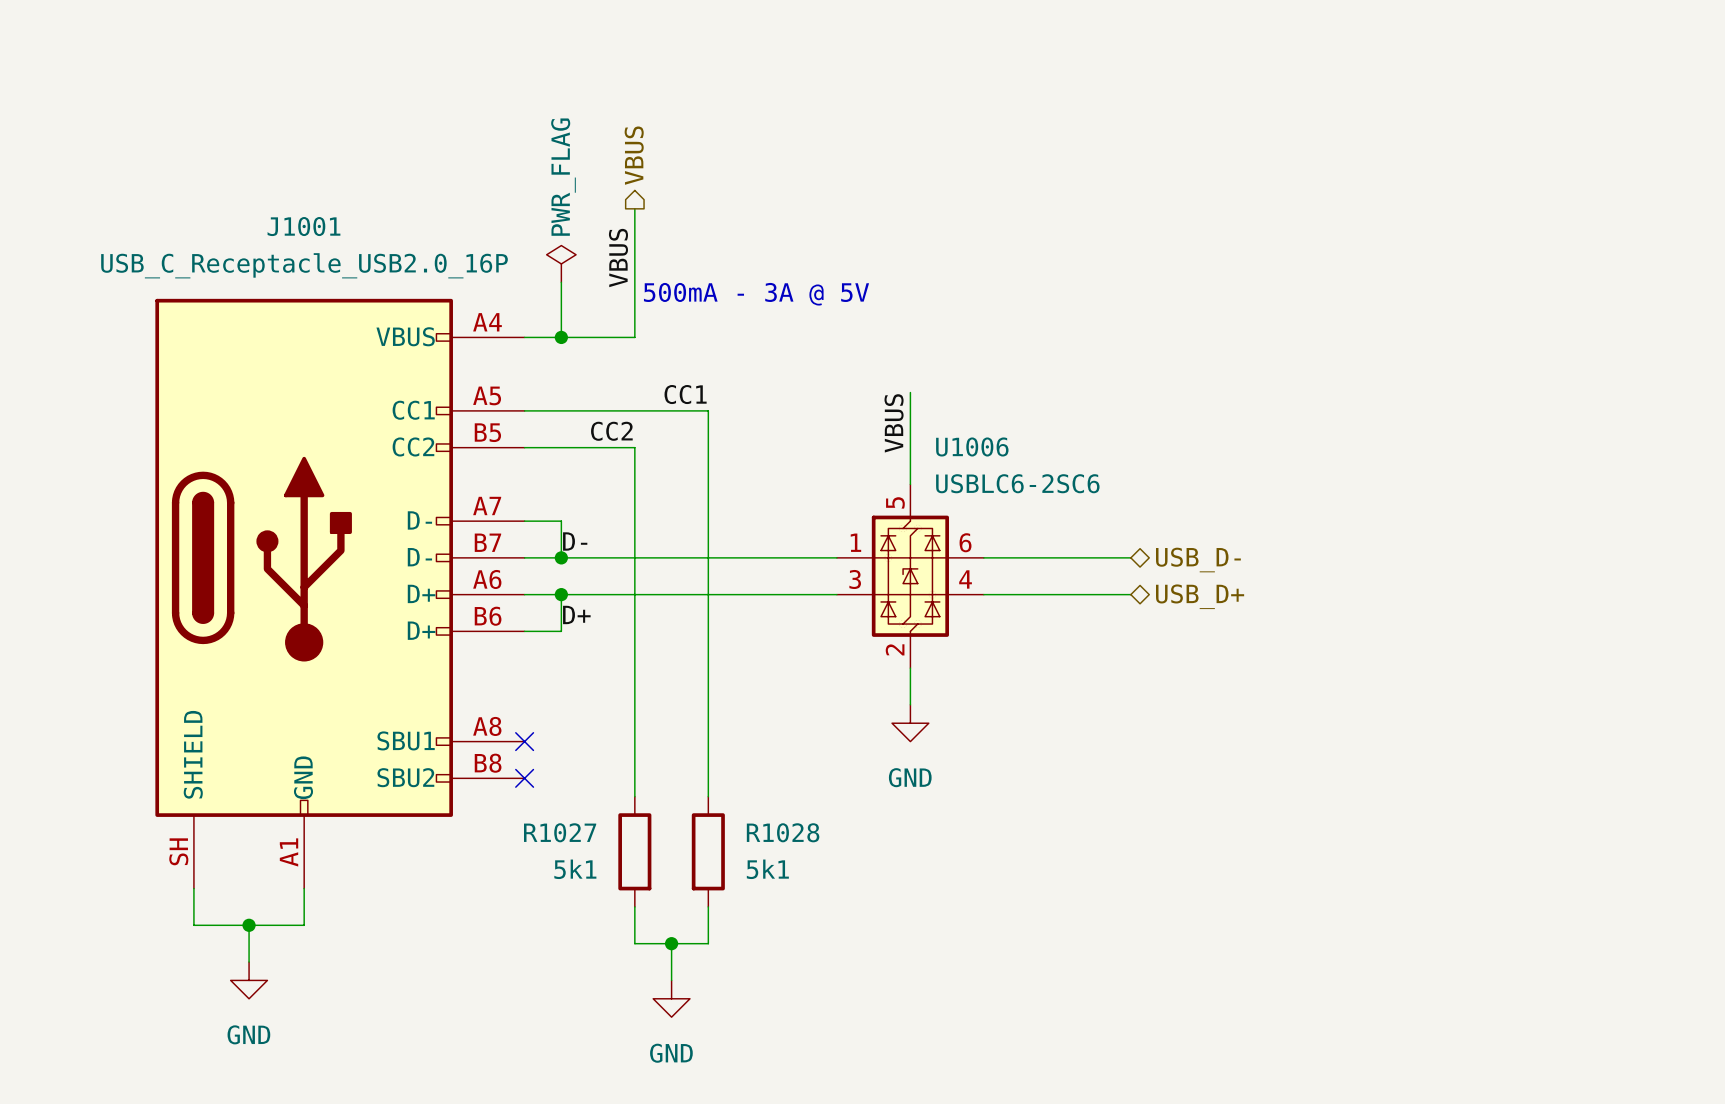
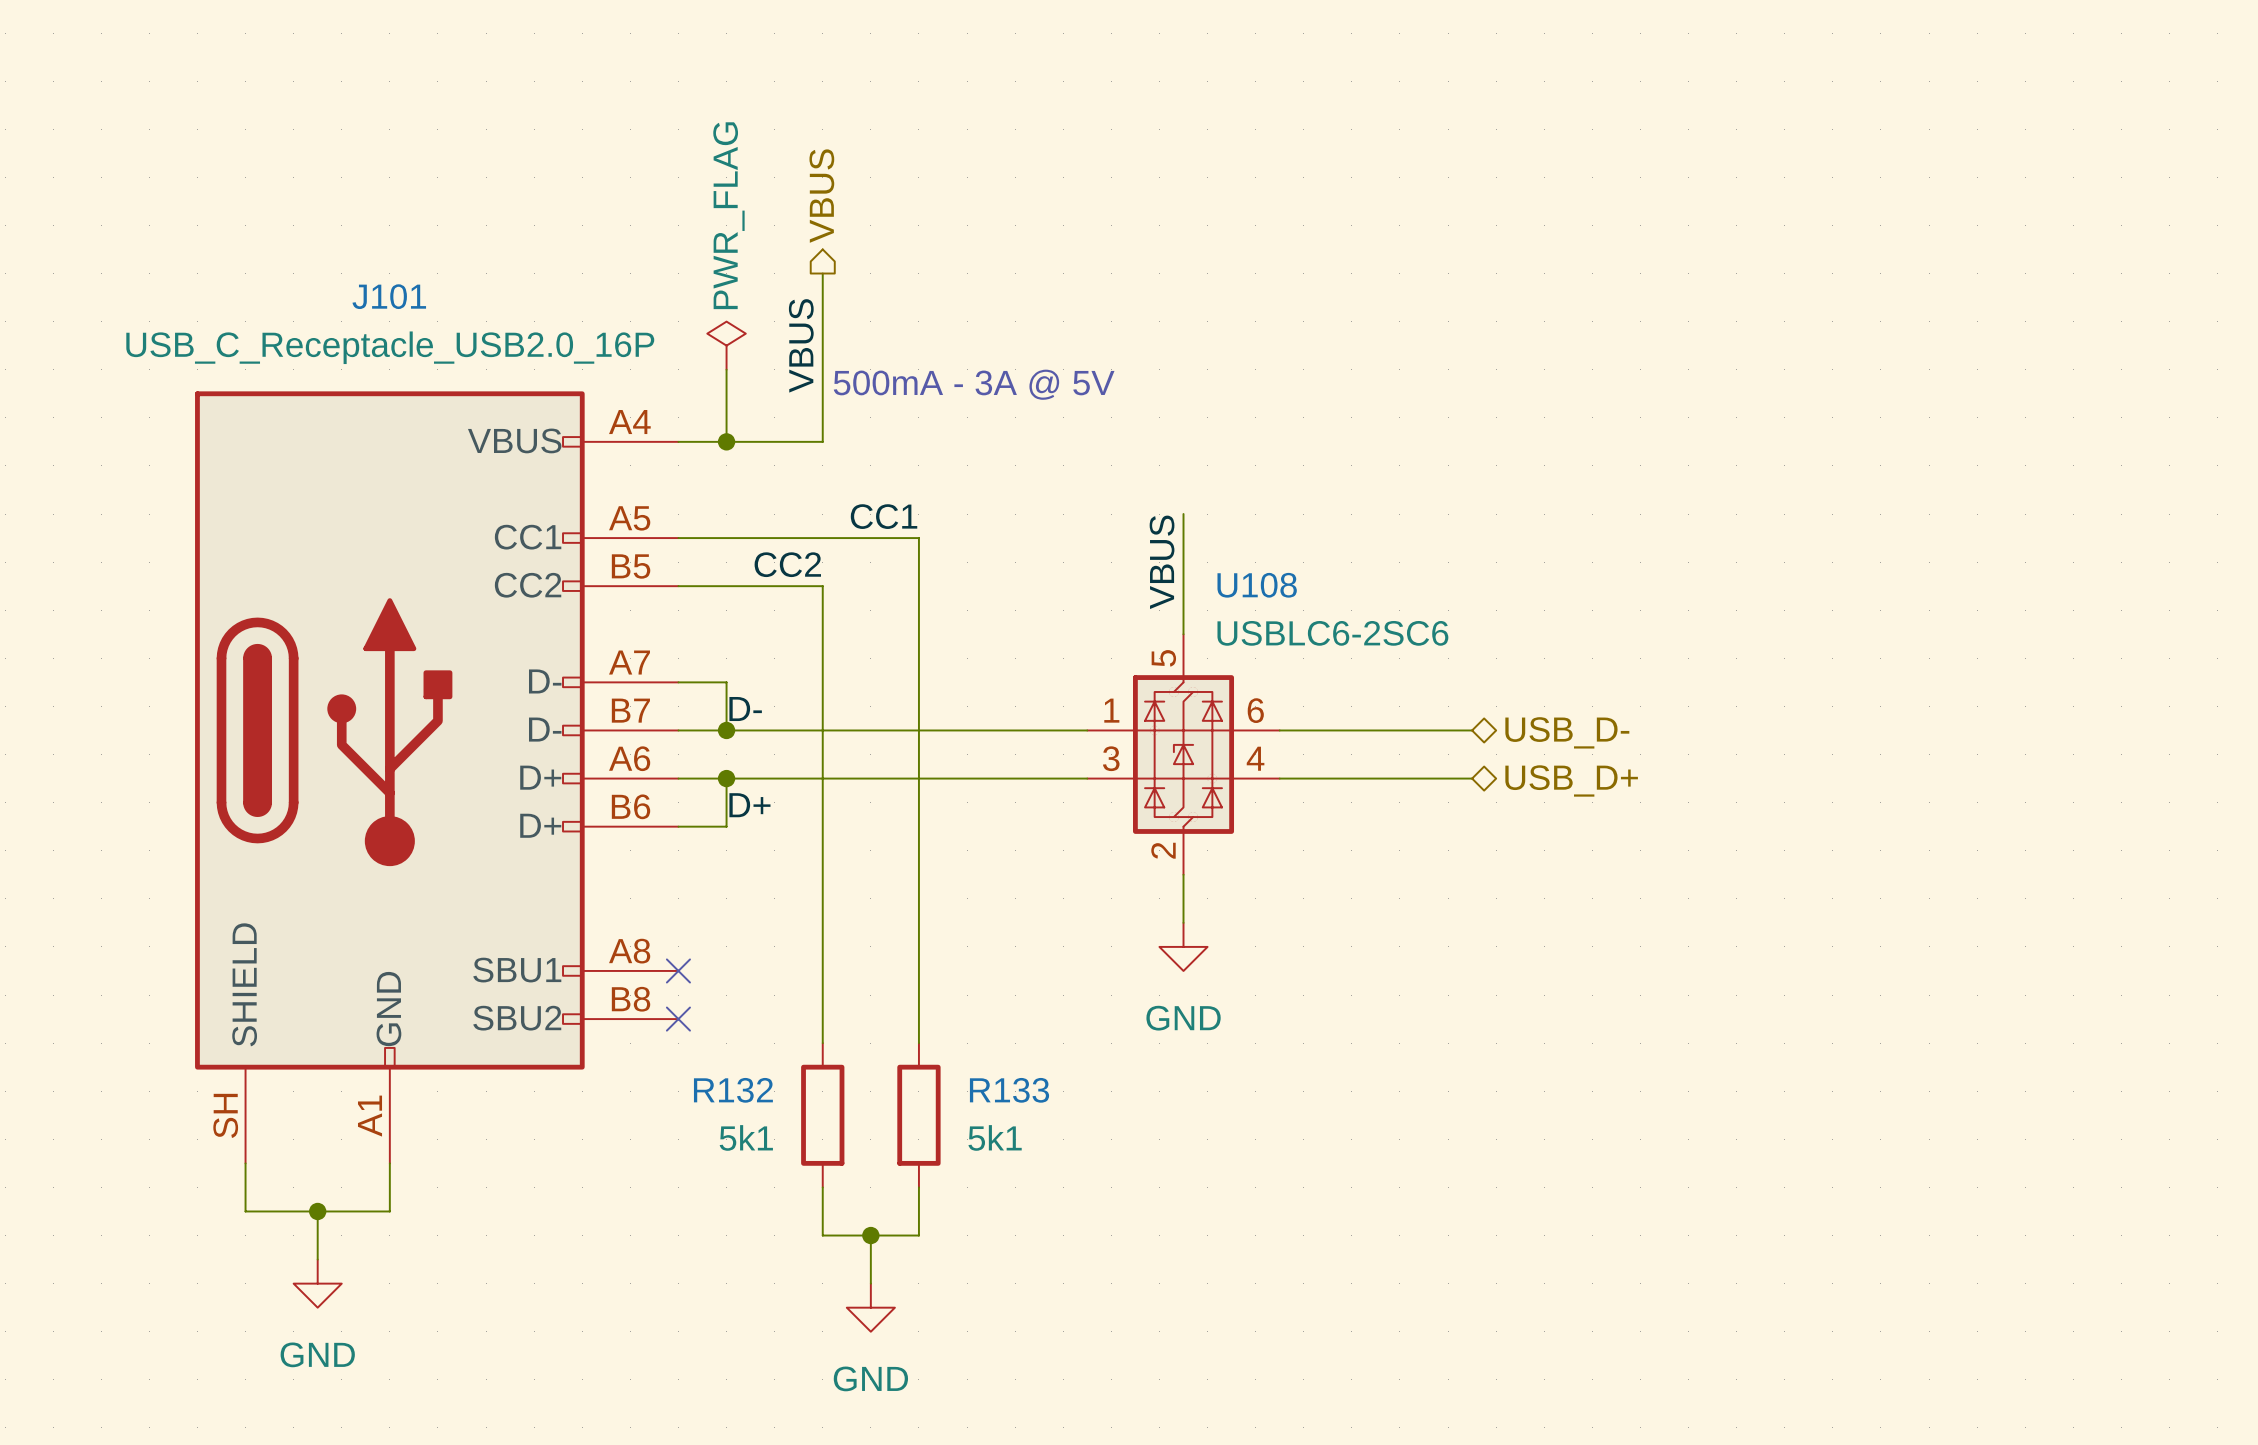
J1001 name: J1001 (303, 226) -> J101 (389, 296)
U1006 name: U1006 (972, 446) -> U108 (1257, 585)
R1027 name: R1027 (560, 832) -> R132 (733, 1090)
R1028 name: R1028 (783, 832) -> R133 (1009, 1090)

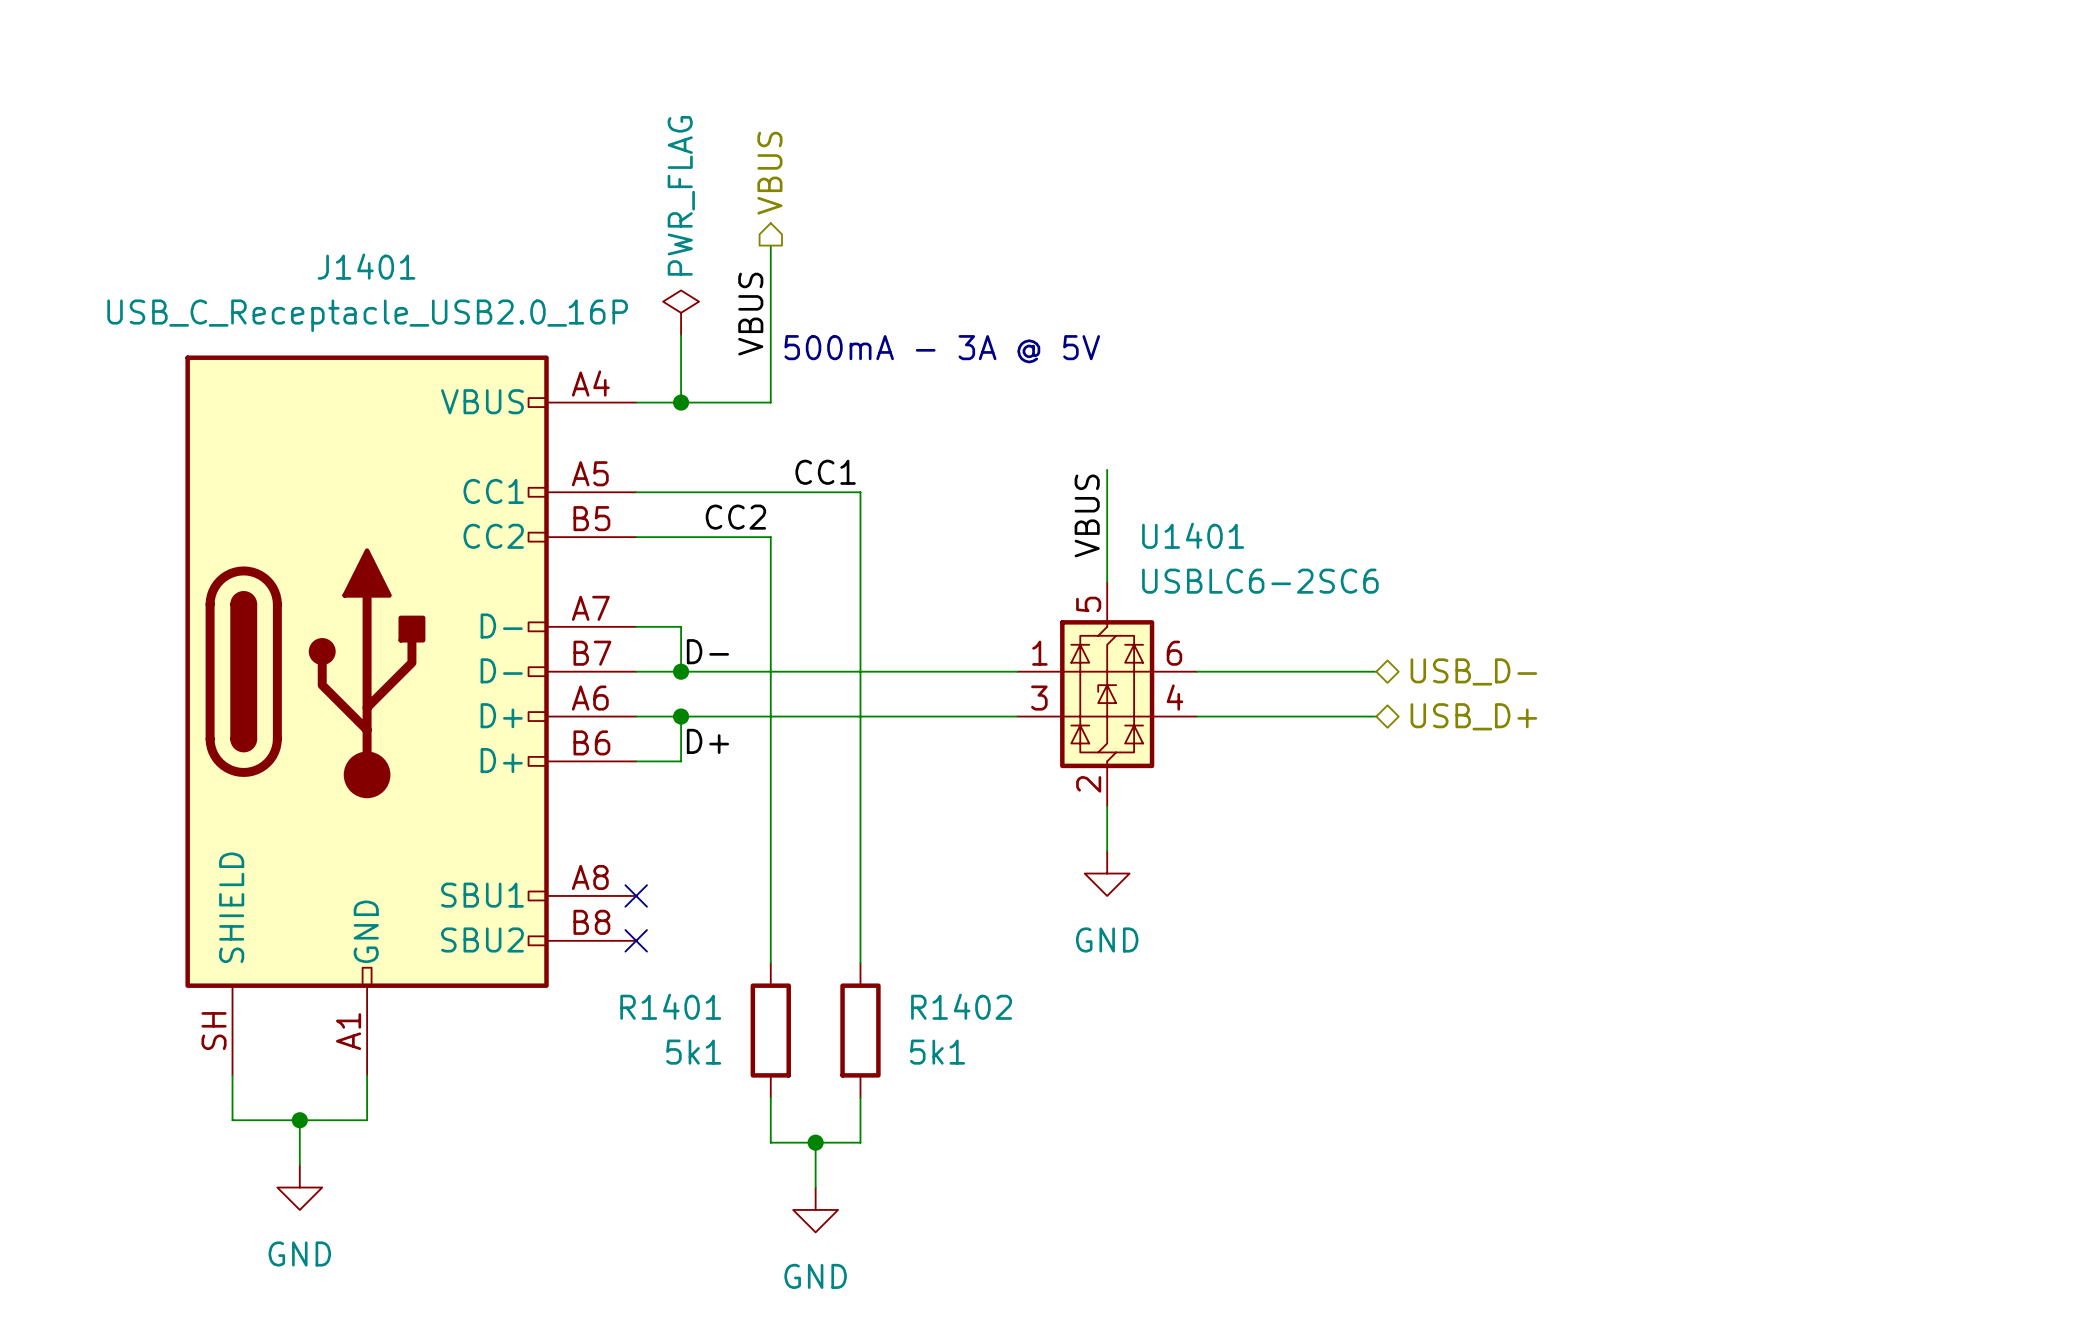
J101 name: J101 (389, 296) -> J1401 (366, 266)
U108 name: U108 (1257, 585) -> U1401 (1193, 535)
R132 name: R132 (733, 1090) -> R1401 (670, 1006)
R133 name: R133 (1009, 1090) -> R1402 (961, 1006)

